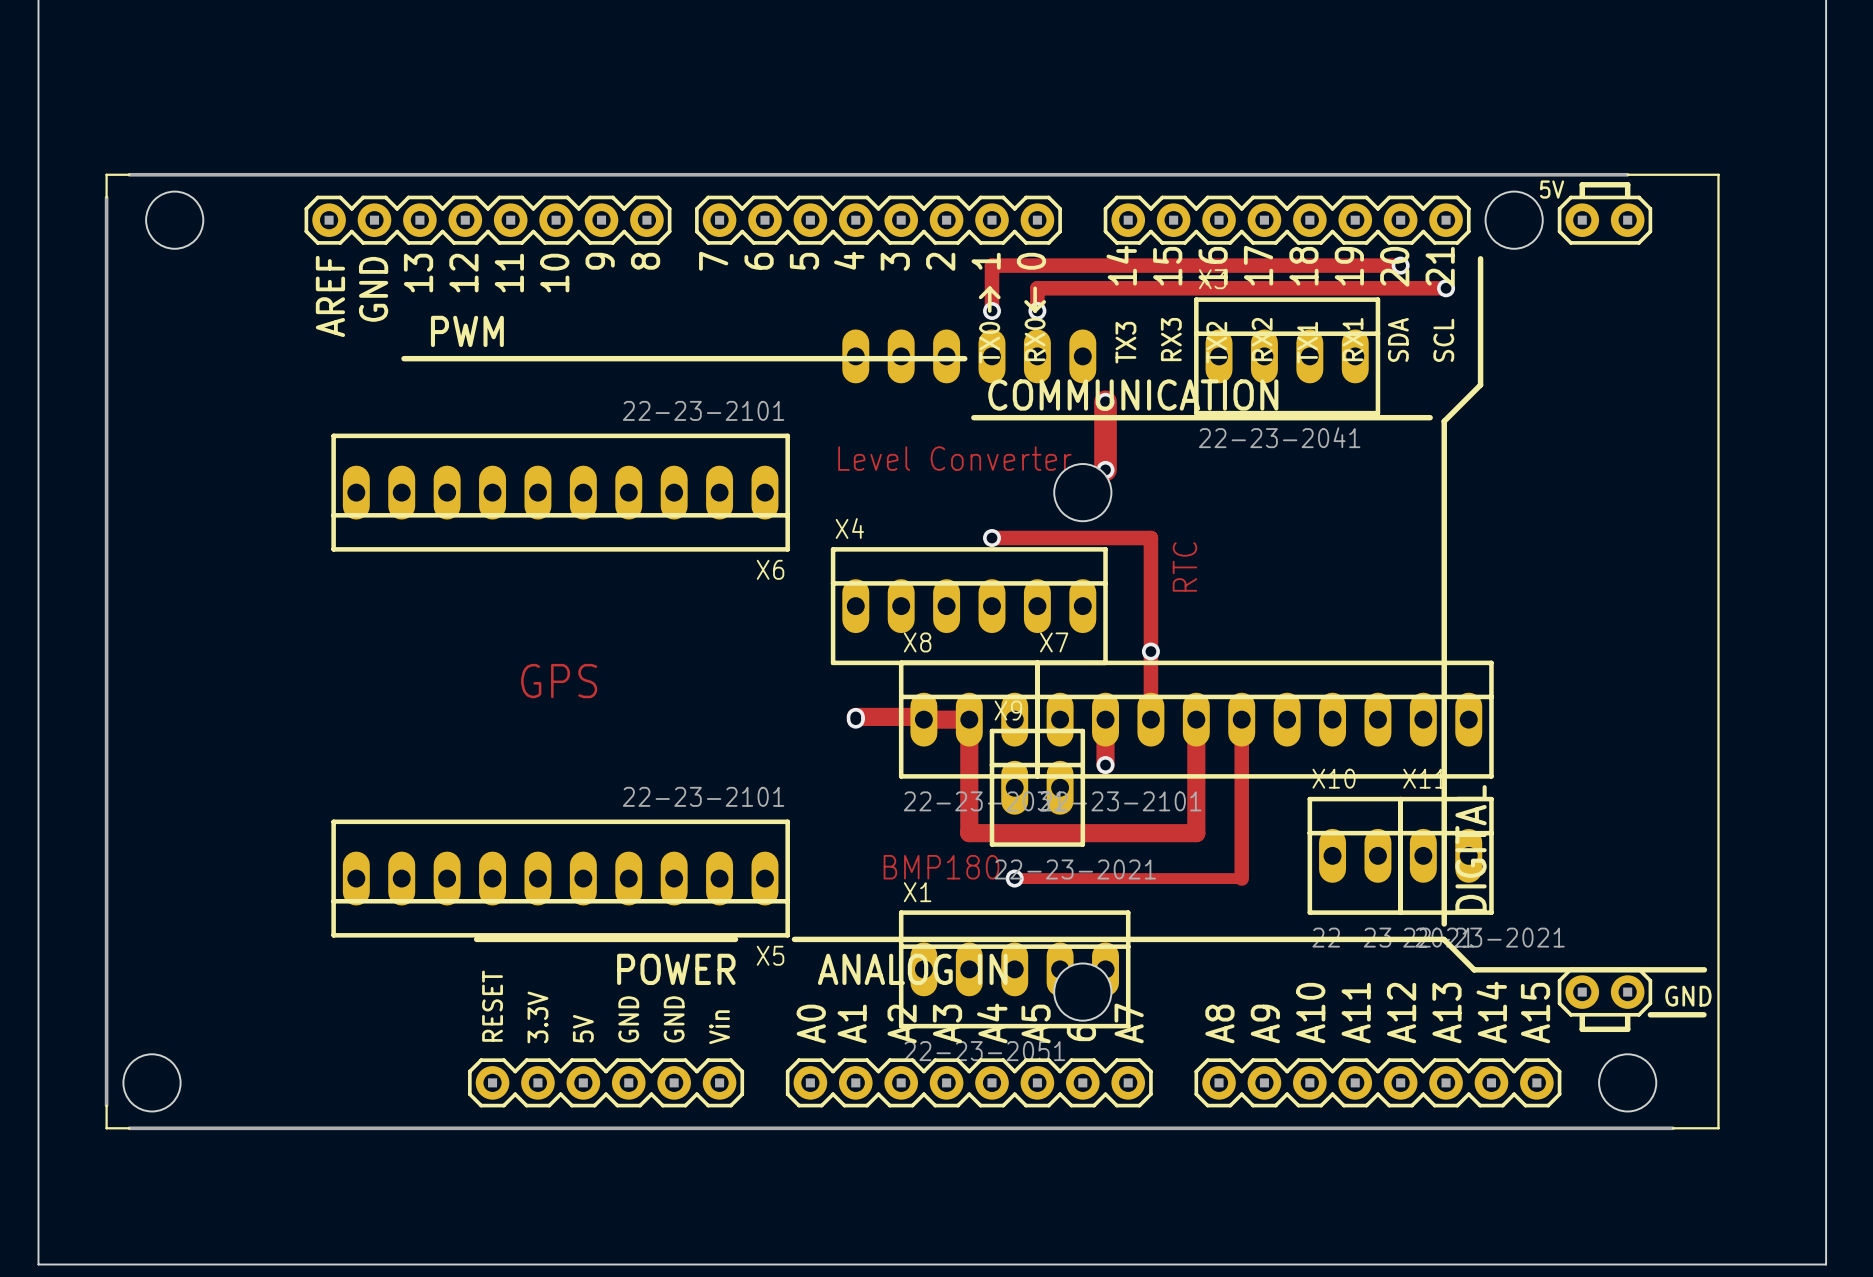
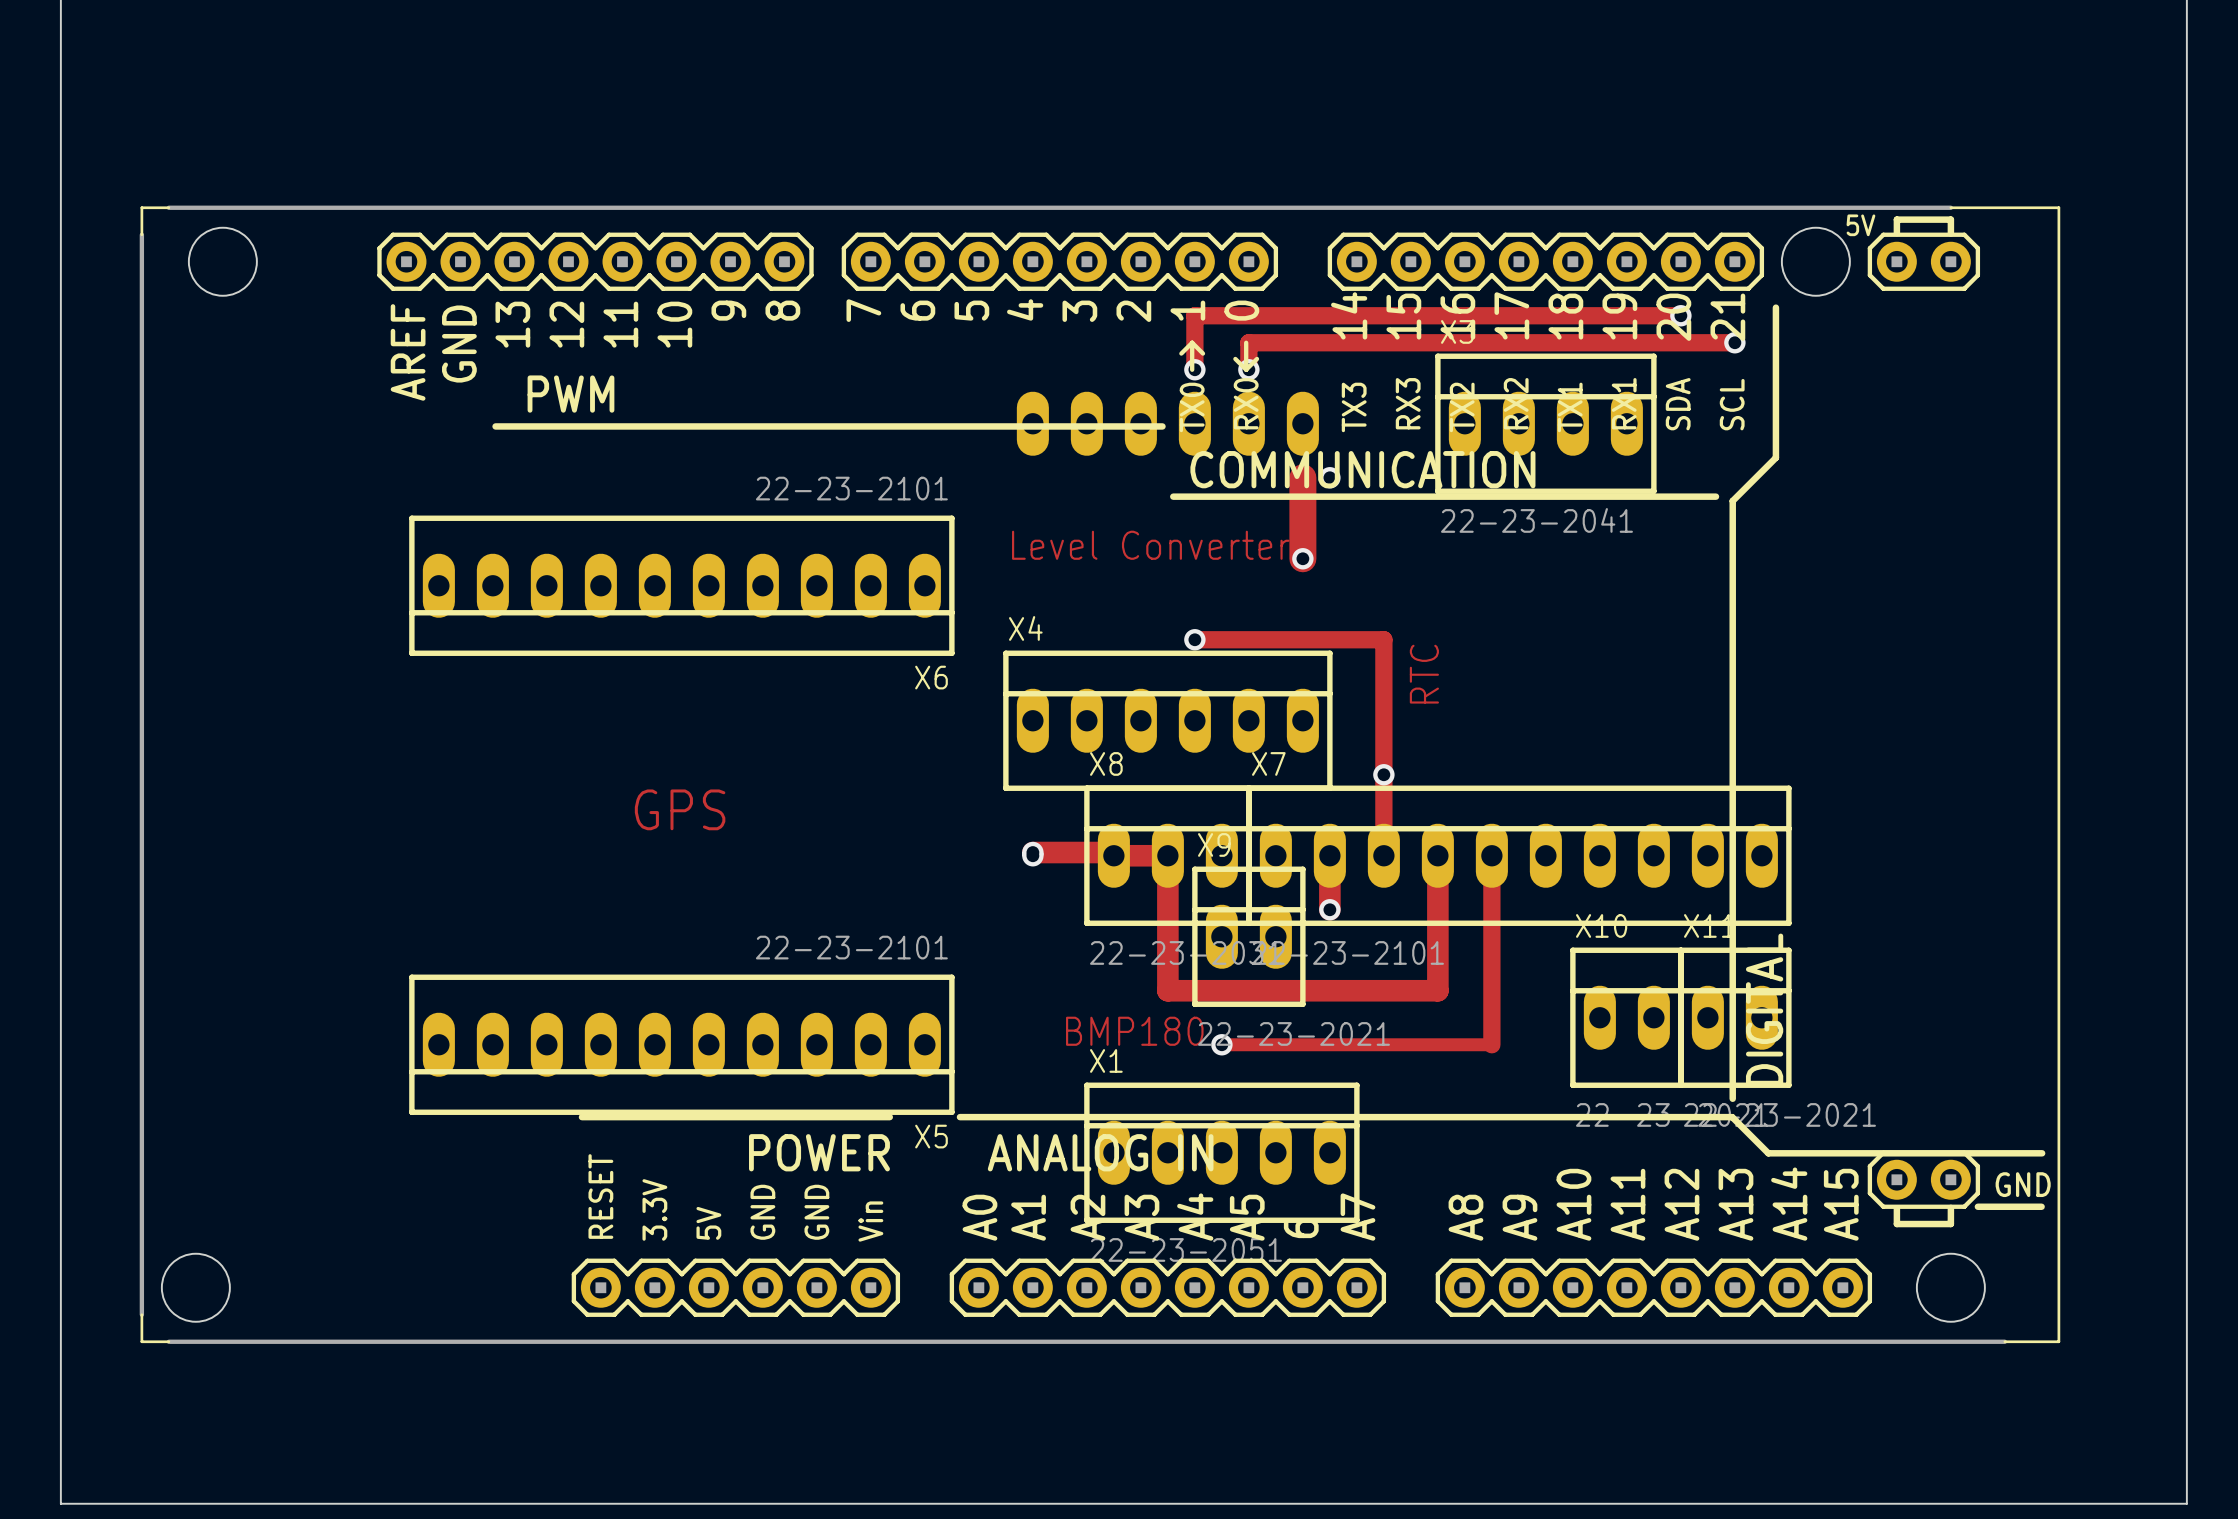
part footprint: [104, 172, 1720, 1131] -> [139, 205, 2061, 1344]
track: (1105, 401) (1105, 469) -> (1302, 477) (1302, 558)
via position: (1105, 469) -> (1302, 558)

